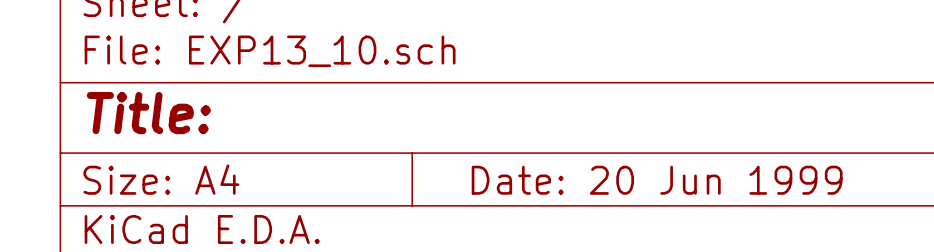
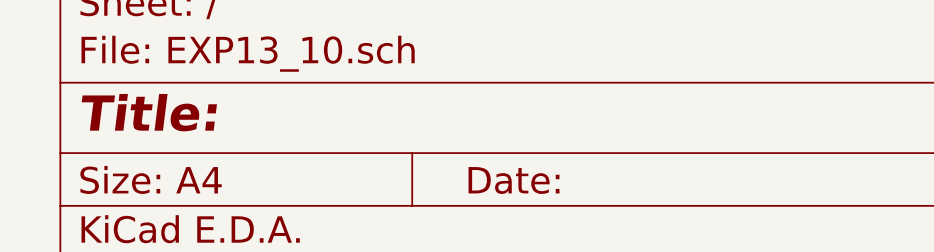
title block: Date: 20 Jun 1999 (657, 180) -> Date: (514, 180)

